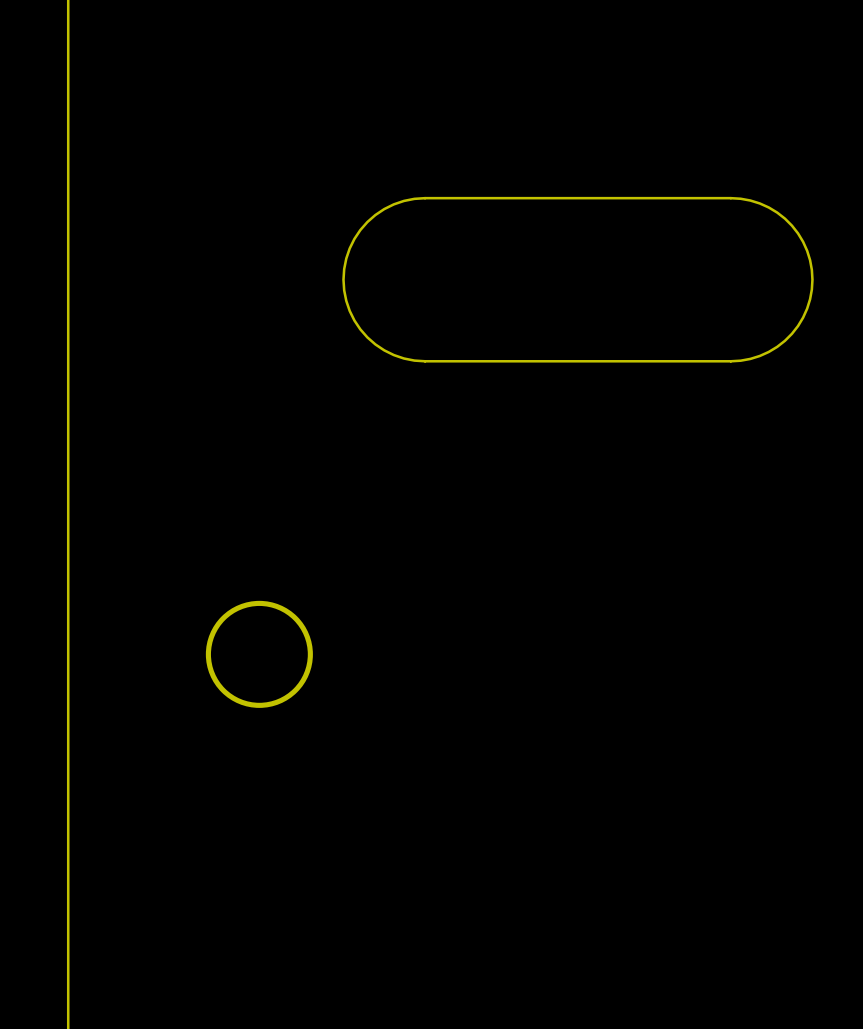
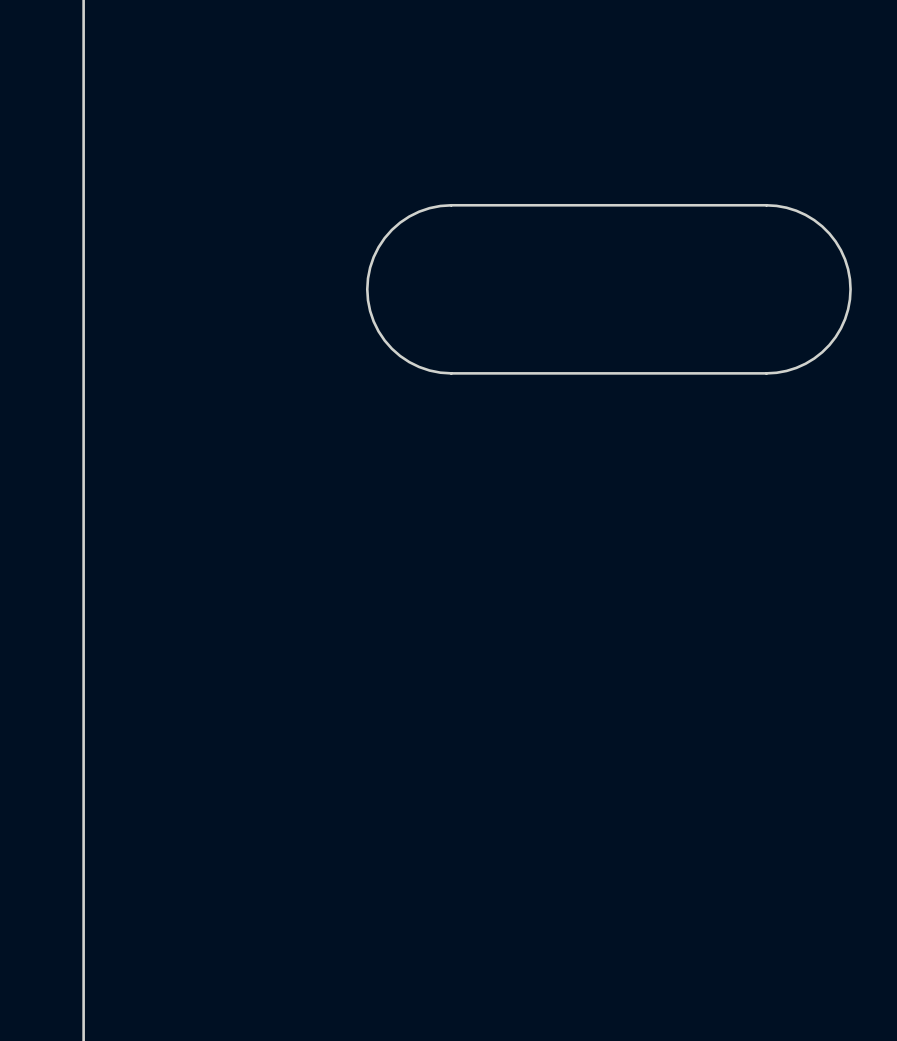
round board edge: [205, 600, 313, 708] -> none

